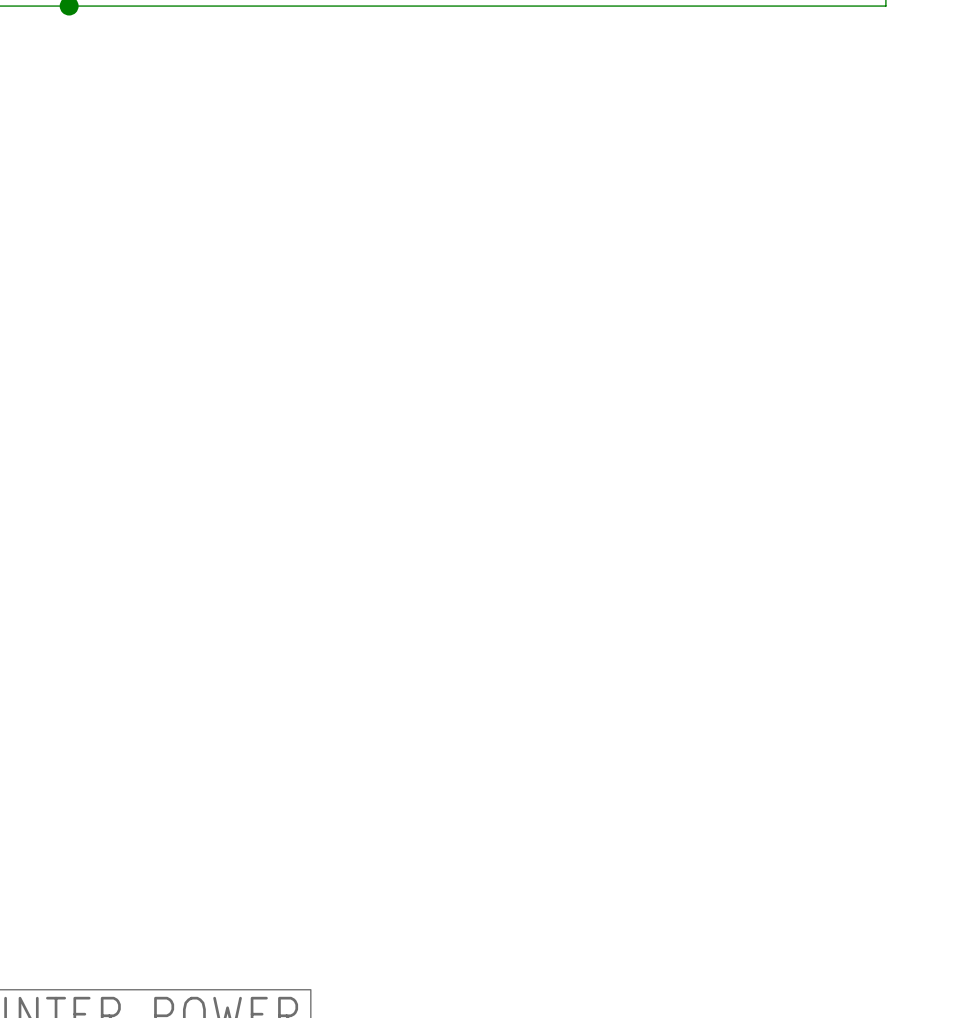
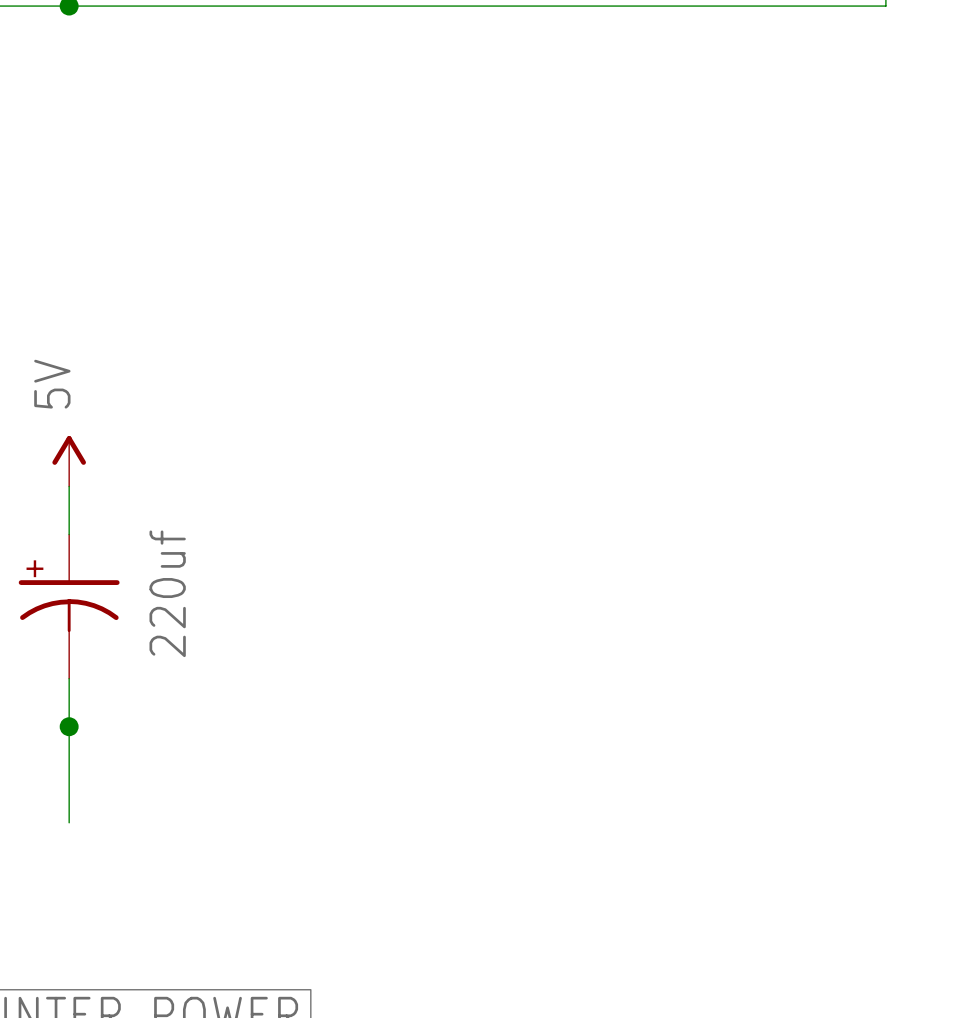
power symbol: none -> 5V (69, 461)
wire: none -> (69, 486) (69, 534)
part: none -> 220uf (69, 606)
wire: none -> (69, 678) (69, 822)
junction: none -> (69, 726)

